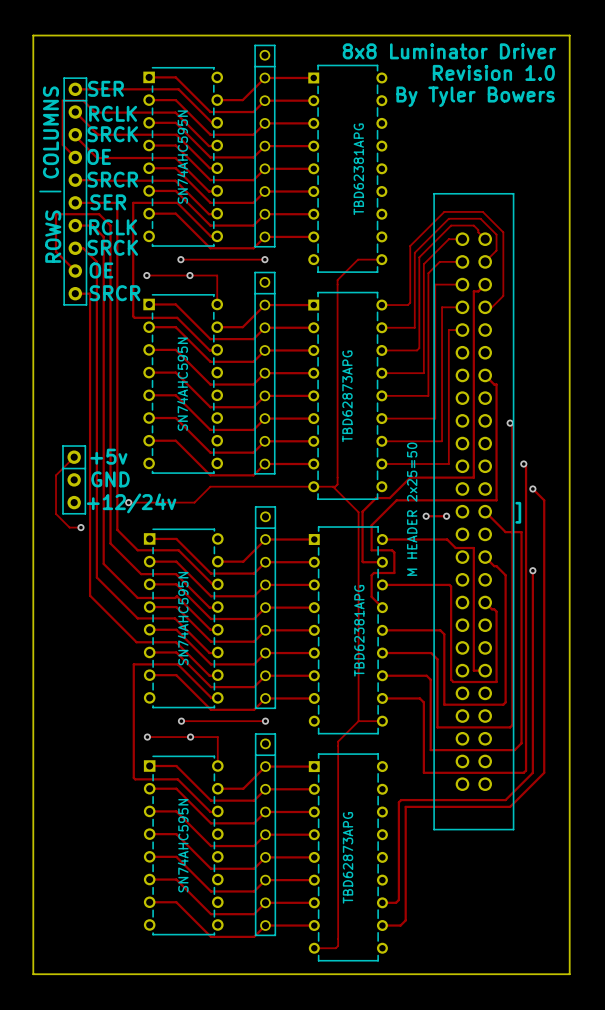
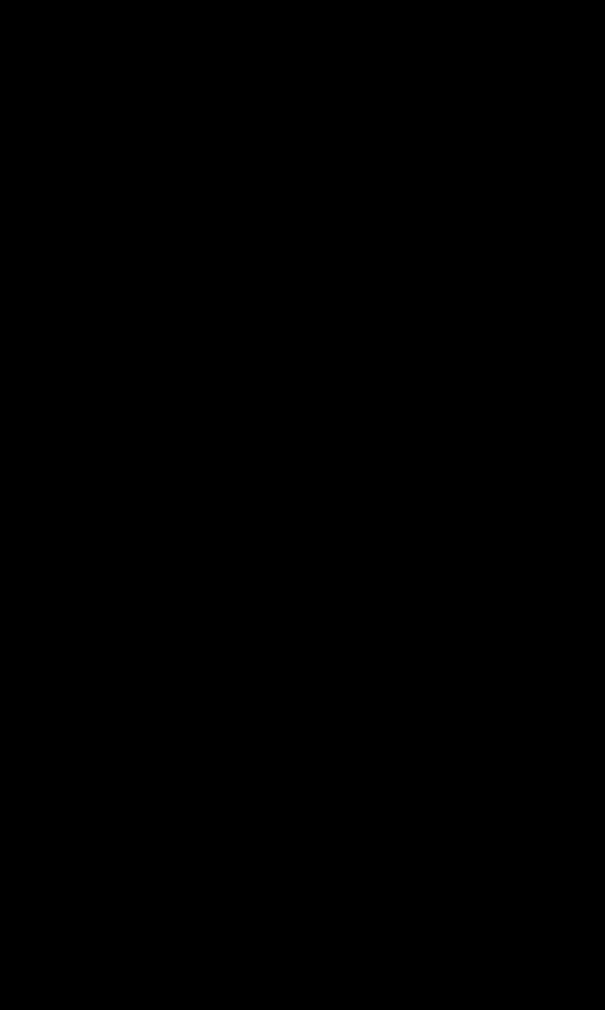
board edge: (33, 35) (569, 35) (569, 974) (33, 974) (33, 35) -> none
text: 8x8 Luminator Driver (449, 51) -> none
text: Revision 1.0 (493, 72) -> none
track: (149, 77) (175, 77) (210, 112) (253, 112) (264, 100) (313, 100) -> none
track: (313, 77) (264, 77) (242, 100) (217, 100) -> none
text: SER (105, 88) -> none
track: (75, 89) (178, 89) (212, 122) (217, 122) -> none
text: By Tyler Bowers (475, 96) -> none
track: (149, 100) (175, 100) (210, 134) (253, 134) (264, 123) (313, 123) -> none
track: (75, 112) (98, 134) (176, 134) (209, 168) (217, 168) -> none
text: RCLK (113, 113) -> none
track: (149, 122) (175, 122) (210, 157) (253, 157) (264, 146) (313, 146) -> none
text: COLUMNS (50, 132) -> none
text: SRCK (112, 134) -> none
track: (74, 135) (97, 158) (175, 158) (209, 191) (216, 191) -> none
track: (149, 145) (175, 145) (210, 180) (253, 180) (264, 168) (313, 168) -> none
track: (216, 146) (209, 146) (175, 112) (95, 112) (83, 100) (62, 100) (62, 144) (75, 157) -> none
part: (264, 146) -> none
text: OE (99, 156) -> none
part: SN74AHC595N (183, 156) -> none
track: (149, 168) (175, 168) (210, 202) (253, 202) (264, 191) (313, 191) -> none
part: TBD62381APG (347, 168) -> none
text: SRCR (112, 179) -> none
track: (75, 180) (175, 180) (209, 214) (216, 214) -> none
track: (149, 190) (175, 190) (210, 225) (253, 225) (264, 214) (313, 214) -> none
line: (40, 191) (60, 191) -> none
part: (75, 191) -> none
track: (75, 202) (117, 202) (117, 529) (137, 550) (178, 550) (212, 584) (217, 584) -> none
text: SER (108, 202) -> none
track: (149, 213) (175, 213) (210, 248) (253, 248) (264, 236) (313, 236) -> none
track: (75, 225) (92, 225) (103, 236) (103, 563) (137, 597) (175, 597) (176, 596) (210, 629) (217, 629) -> none
text: RCLK (113, 227) -> none
text: ROWS (53, 236) -> none
track: (218, 236) (210, 236) (177, 202) (133, 202) (133, 316) (177, 317) (209, 350) (217, 350) -> none
track: (462, 239) (448, 239) (423, 264) (423, 373) (381, 373) -> none
track: (485, 239) (473, 225) (451, 225) (419, 257) (419, 348) (417, 350) (381, 350) -> none
text: SRCK (112, 247) -> none
track: (75, 248) (83, 248) (96, 261) (96, 577) (137, 618) (174, 618) (209, 653) (216, 653) -> none
track: (180, 259) (264, 259) -> none
via: (180, 259) -> none
via: (264, 259) -> none
track: (381, 259) (358, 259) (337, 280) (337, 484) (335, 486) (210, 486) (194, 502) (128, 502) -> none
track: (462, 261) (439, 261) (428, 273) (428, 395) (381, 395) -> none
track: (485, 261) (496, 250) (496, 234) (480, 218) (448, 218) (414, 252) (414, 327) (381, 327) -> none
track: (75, 270) (56, 251) (56, 214) (99, 214) (110, 225) (110, 543) (141, 574) (176, 574) (209, 607) (216, 607) -> none
text: OE (101, 270) -> none
track: (146, 275) (217, 275) (217, 304) -> none
via: (146, 275) -> none
via: (189, 275) -> none
track: (462, 284) (435, 284) (435, 418) (381, 418) -> none
track: (485, 284) (478, 291) (473, 291) (473, 477) (410, 477) (389, 498) (376, 498) (362, 511) (362, 561) (382, 562) -> none
track: (75, 293) (90, 293) (90, 595) (136, 642) (176, 642) (209, 675) (216, 675) -> none
text: SRCR (115, 293) -> none
track: (149, 304) (175, 304) (210, 339) (253, 339) (264, 327) (313, 327) -> none
track: (313, 305) (264, 305) (242, 327) (217, 327) -> none
track: (381, 305) (407, 305) (410, 302) (410, 246) (444, 211) (482, 211) (503, 232) (503, 295) (491, 307) (485, 307) -> none
track: (462, 307) (442, 307) (442, 441) (381, 441) -> none
track: (149, 327) (175, 327) (210, 361) (253, 361) (264, 350) (313, 350) -> none
track: (462, 330) (448, 330) (448, 464) (381, 464) -> none
track: (149, 349) (175, 349) (210, 384) (253, 384) (264, 373) (313, 373) -> none
track: (149, 372) (175, 372) (210, 407) (253, 407) (264, 395) (313, 395) -> none
part: (264, 373) -> none
track: (485, 375) (496, 384) (496, 500) (396, 500) (371, 525) (371, 550) (392, 550) (394, 552) (394, 572) (373, 572) (371, 575) (371, 596) (382, 607) -> none
part: SN74AHC595N (183, 383) -> none
track: (149, 395) (175, 395) (210, 429) (253, 429) (264, 418) (313, 418) -> none
part: TBD62873APG (347, 395) -> none
track: (149, 418) (175, 418) (210, 452) (253, 452) (264, 441) (313, 441) -> none
track: (510, 423) (512, 425) (512, 725) (510, 727) (437, 727) (437, 659) (431, 653) (382, 653) -> none
via: (510, 423) -> none
track: (149, 440) (175, 440) (210, 475) (253, 475) (264, 464) (313, 464) -> none
text: +5v (108, 456) -> none
track: (74, 457) (56, 475) (56, 513) (69, 527) (80, 527) -> none
track: (523, 464) (526, 466) (526, 770) (523, 772) (423, 772) (423, 702) (419, 698) (382, 698) -> none
via: (523, 464) -> none
part: (74, 479) -> none
text: GND (110, 479) -> none
track: (333, 486) (358, 512) (358, 721) -> none
track: (532, 488) (544, 500) (544, 772) (510, 806) (405, 806) (405, 920) (400, 925) (382, 925) -> none
via: (532, 488) -> none
via: (128, 502) -> none
text: +12/24v (131, 503) -> none
part: M HEADER 2x25=50 (473, 511) -> none
track: (485, 511) (505, 532) (521, 532) (521, 743) (514, 750) (430, 750) (430, 679) (426, 675) (382, 675) -> none
text: ] (518, 512) -> none
track: (426, 516) (446, 516) -> none
via: (426, 516) -> none
via: (446, 516) -> none
via: (80, 527) -> none
track: (149, 538) (176, 538) (210, 573) (254, 573) (265, 562) (314, 562) -> none
track: (314, 539) (265, 539) (243, 561) (217, 561) -> none
track: (382, 539) (447, 539) (455, 548) (473, 548) (473, 670) (485, 670) -> none
track: (485, 557) (505, 575) (505, 702) (503, 704) (444, 704) (444, 634) (440, 630) (382, 630) -> none
track: (149, 561) (176, 561) (210, 596) (254, 596) (265, 584) (314, 584) -> none
track: (532, 570) (532, 772) (505, 800) (401, 800) (398, 802) (398, 899) (396, 902) (382, 902) -> none
via: (532, 570) -> none
track: (149, 584) (176, 584) (210, 618) (254, 618) (265, 607) (314, 607) -> none
track: (382, 584) (449, 584) (451, 586) (451, 679) (453, 681) (496, 681) (496, 611) (485, 602) -> none
track: (149, 607) (176, 607) (210, 641) (254, 641) (265, 630) (314, 630) -> none
part: (265, 607) -> none
part: SN74AHC595N (183, 618) -> none
track: (149, 629) (176, 629) (210, 664) (254, 664) (265, 653) (314, 653) -> none
part: TBD62381APG (348, 630) -> none
track: (149, 652) (176, 652) (210, 687) (254, 687) (265, 675) (314, 675) -> none
track: (149, 675) (176, 675) (210, 709) (254, 709) (265, 698) (314, 698) -> none
track: (218, 697) (211, 697) (177, 664) (133, 664) (133, 777) (177, 779) (210, 811) (217, 811) -> none
track: (181, 721) (265, 721) -> none
via: (181, 721) -> none
via: (265, 721) -> none
track: (358, 721) (382, 721) -> none
track: (358, 721) (338, 741) (338, 945) (335, 948) (314, 948) -> none
track: (147, 737) (217, 737) (217, 766) -> none
via: (147, 737) -> none
via: (190, 737) -> none
track: (149, 766) (176, 766) (210, 800) (254, 800) (265, 789) (314, 789) -> none
track: (314, 766) (265, 766) (243, 788) (217, 788) -> none
track: (149, 788) (176, 788) (210, 823) (254, 823) (265, 811) (314, 811) -> none
track: (149, 811) (176, 811) (210, 846) (254, 846) (265, 834) (314, 834) -> none
track: (149, 834) (176, 834) (210, 868) (254, 868) (265, 857) (314, 857) -> none
part: (265, 834) -> none
part: SN74AHC595N (183, 845) -> none
track: (149, 856) (176, 856) (210, 891) (254, 891) (265, 880) (314, 880) -> none
part: TBD62873APG (348, 857) -> none
track: (149, 879) (176, 879) (210, 914) (254, 914) (265, 902) (314, 902) -> none
track: (149, 902) (176, 902) (210, 936) (254, 936) (265, 925) (314, 925) -> none

